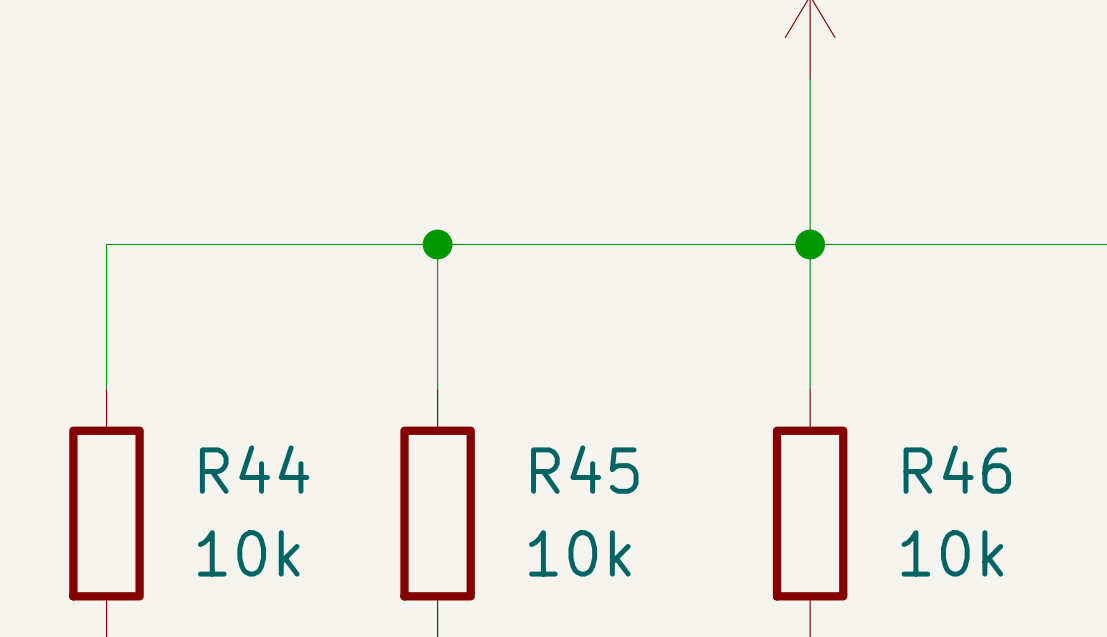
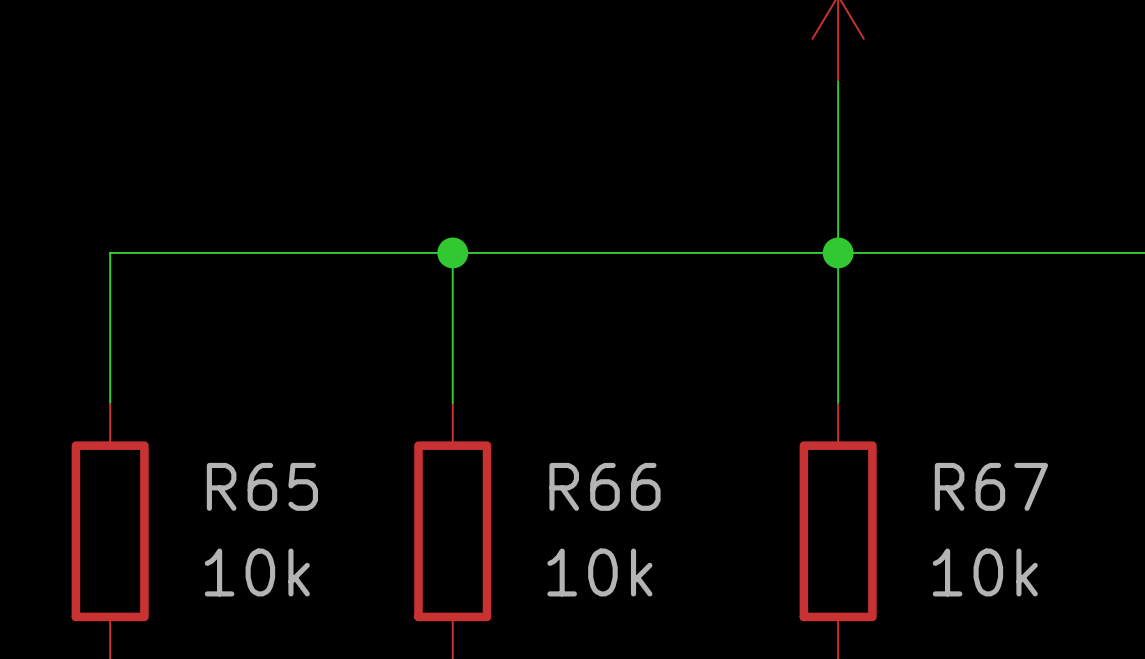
R44 name: R44 (254, 469) -> R65 (262, 486)
R45 name: R45 (584, 469) -> R66 (604, 486)
R46 name: R46 (957, 469) -> R67 (991, 486)

